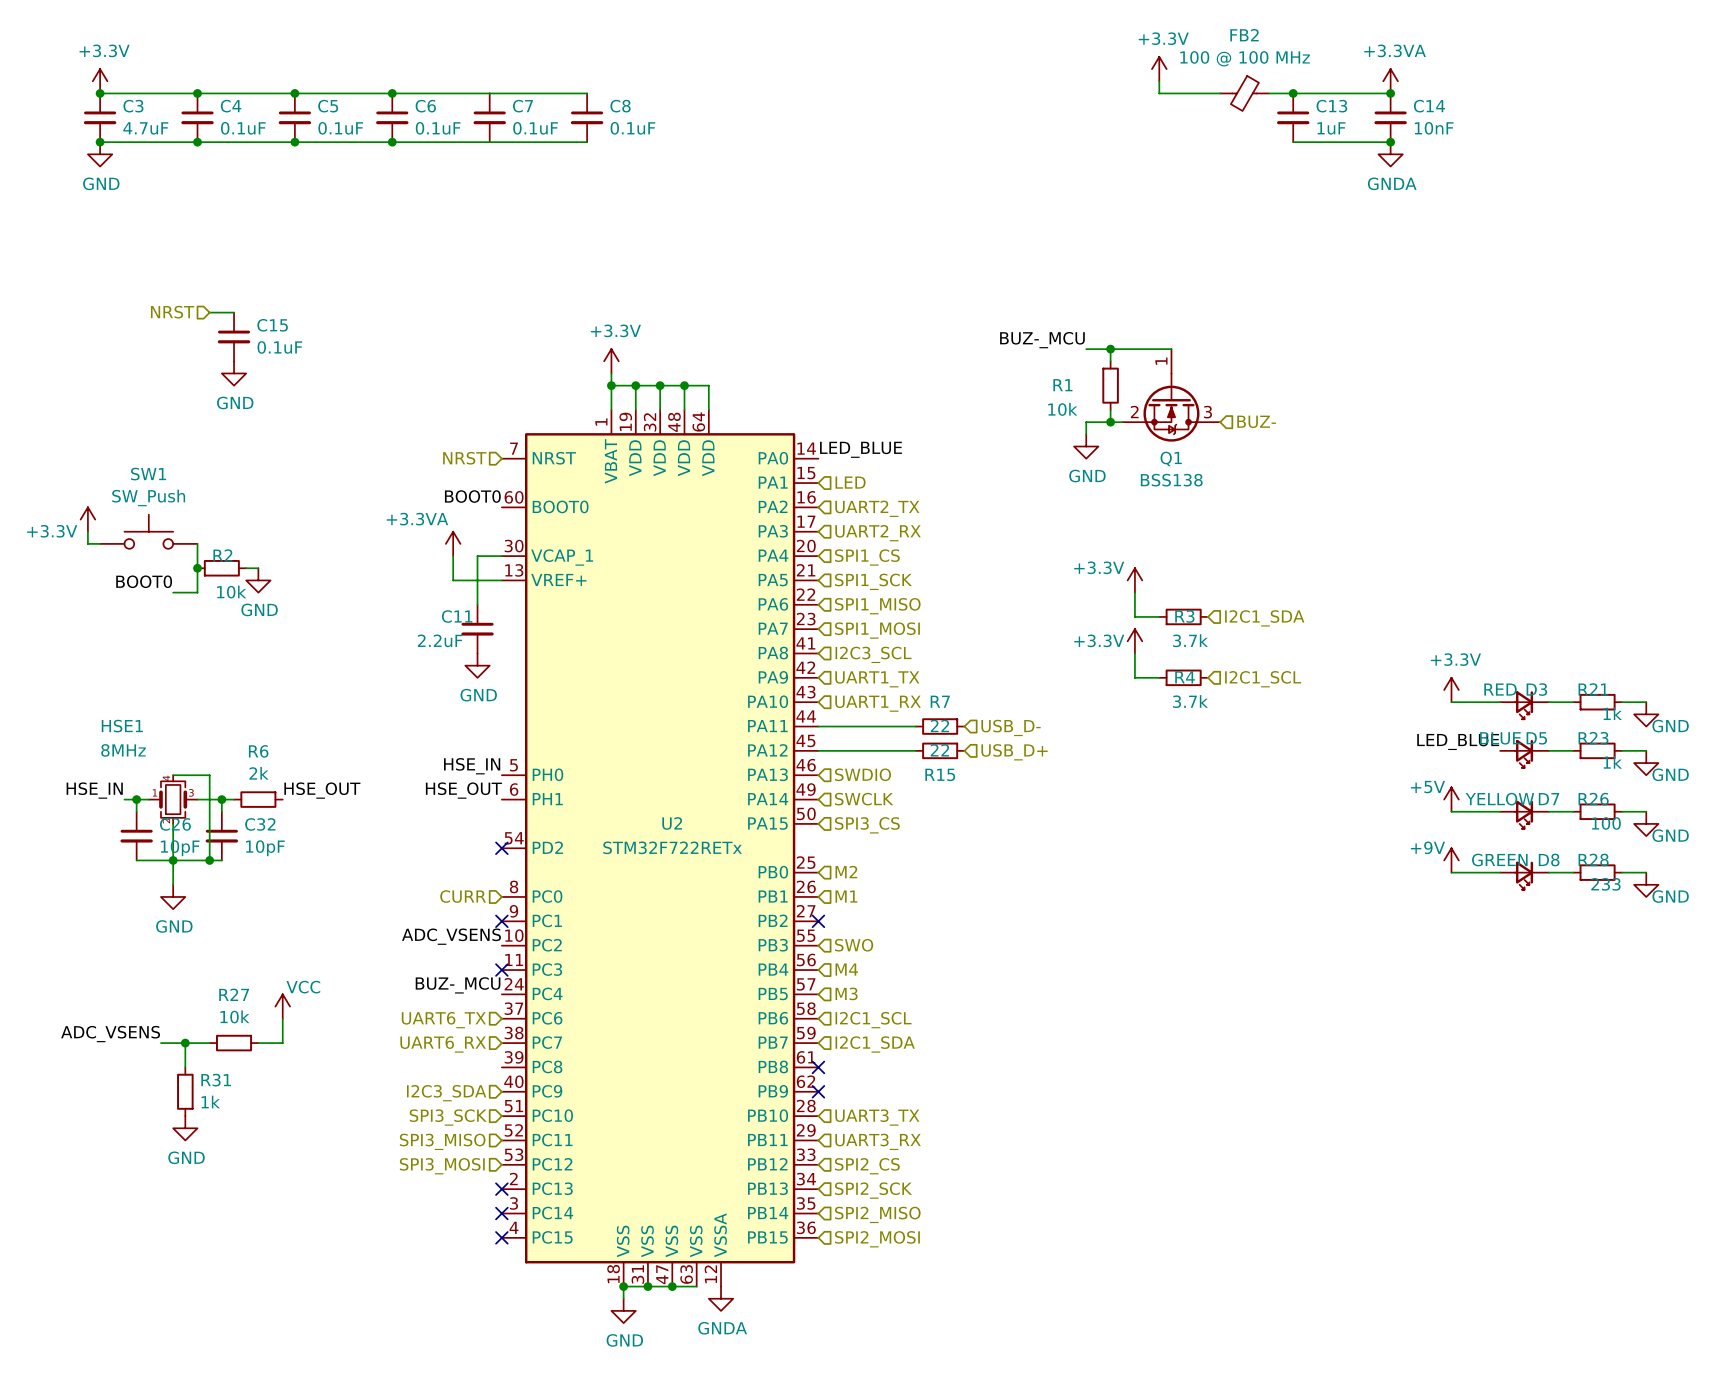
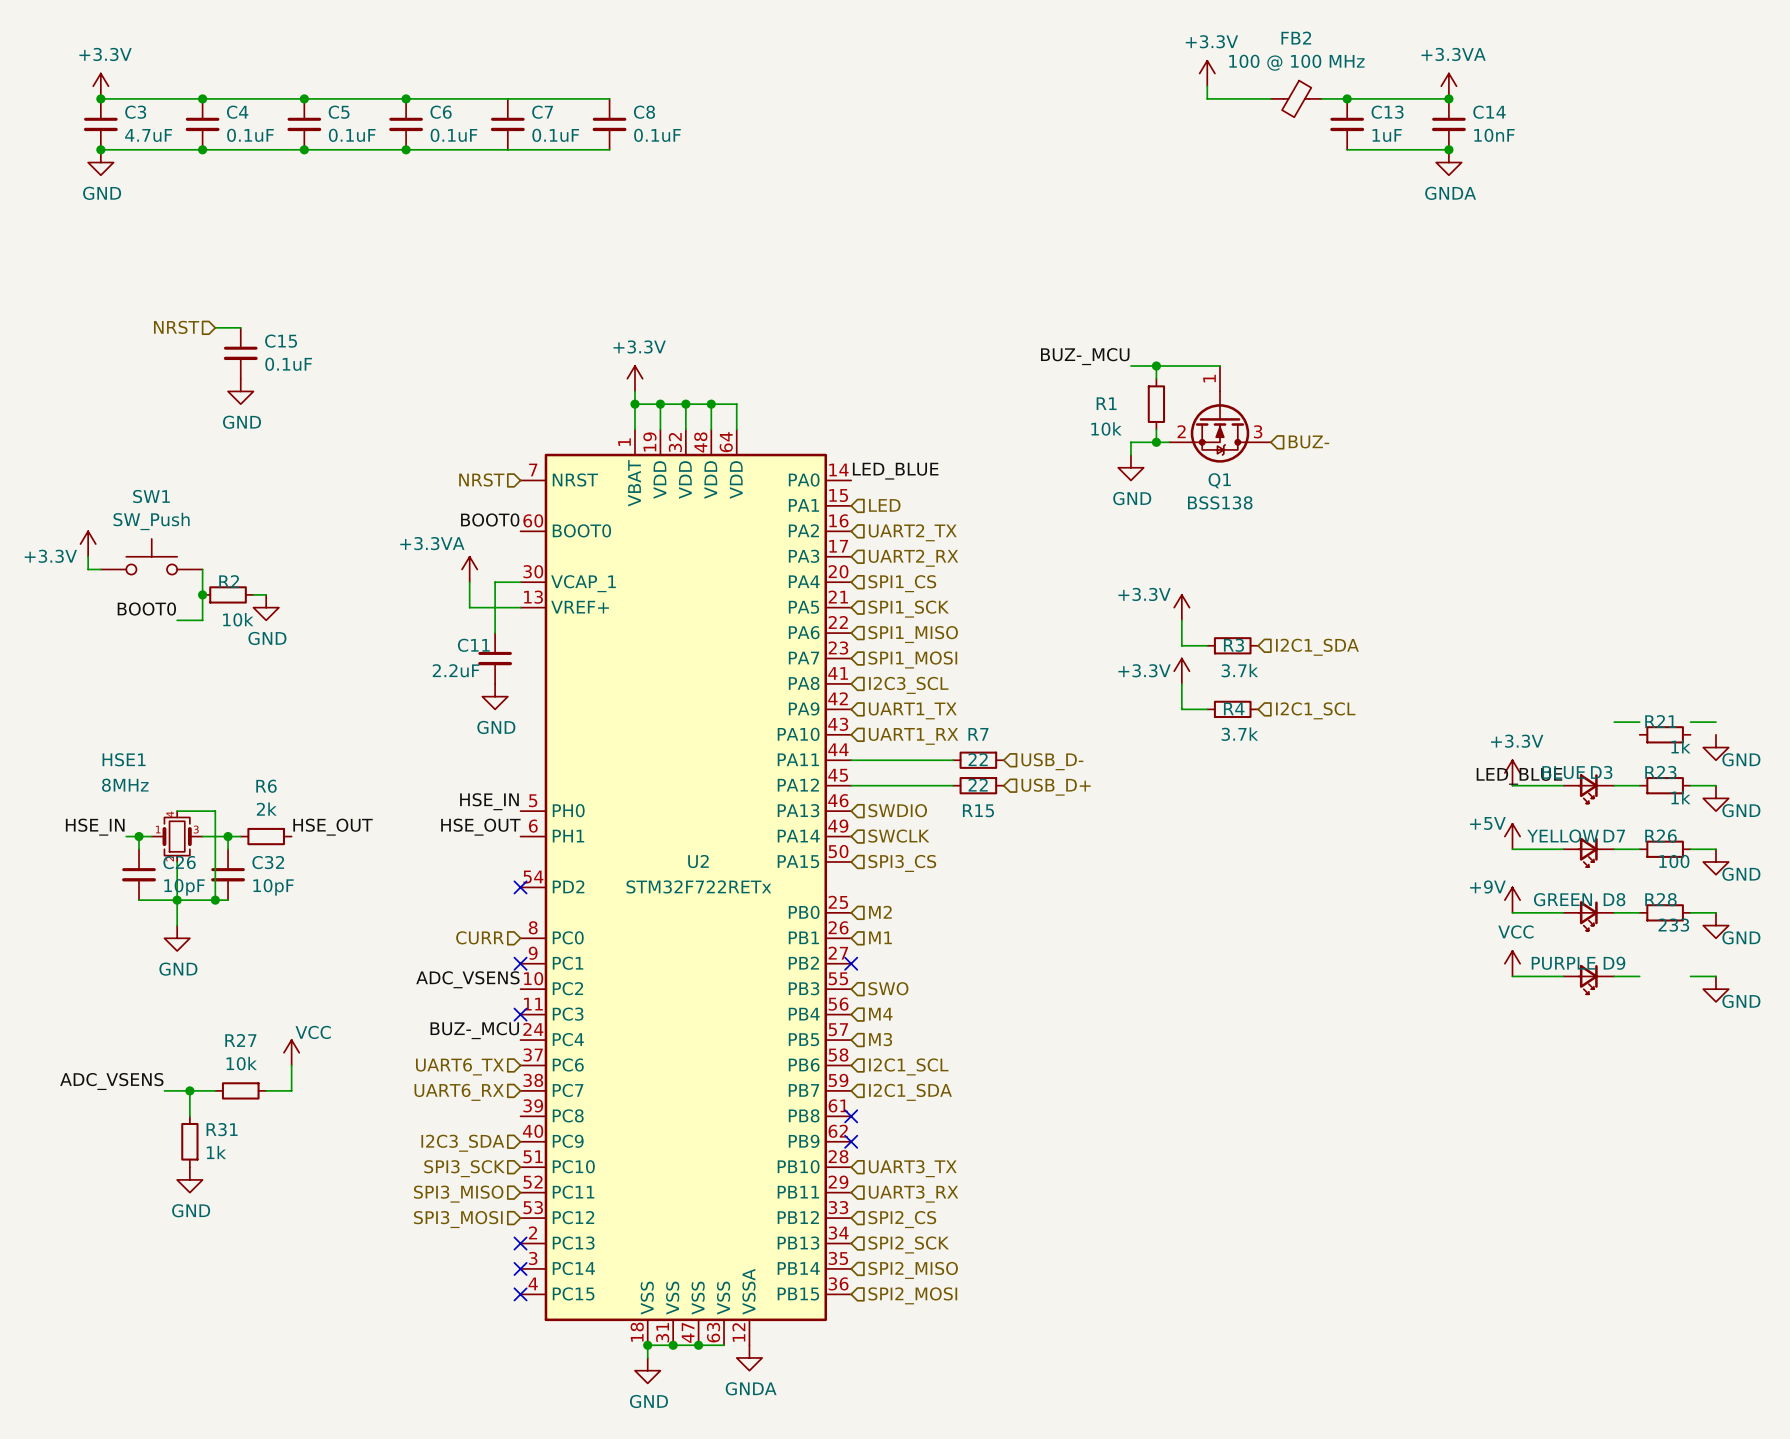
power symbol position: +3.3V (1451, 690) -> +3.3V (1512, 772)
wire: none -> (1614, 722) (1639, 722)
wire: none -> (1690, 722) (1715, 722)
wire: (1451, 702) (1500, 702) -> (1512, 976) (1563, 976)
wire: (1548, 702) (1573, 702) -> (1614, 976) (1639, 976)
wire: (1621, 702) (1646, 702) -> (1690, 976) (1715, 976)
D3: RED (1524, 705) -> none
D5 name: D5 (1536, 738) -> D3 (1601, 772)
wire: none -> (1512, 785) (1563, 785)
power symbol: none -> VCC (1512, 963)
D9: none -> PURPLE (1588, 979)
power symbol: none -> GND (1715, 989)

